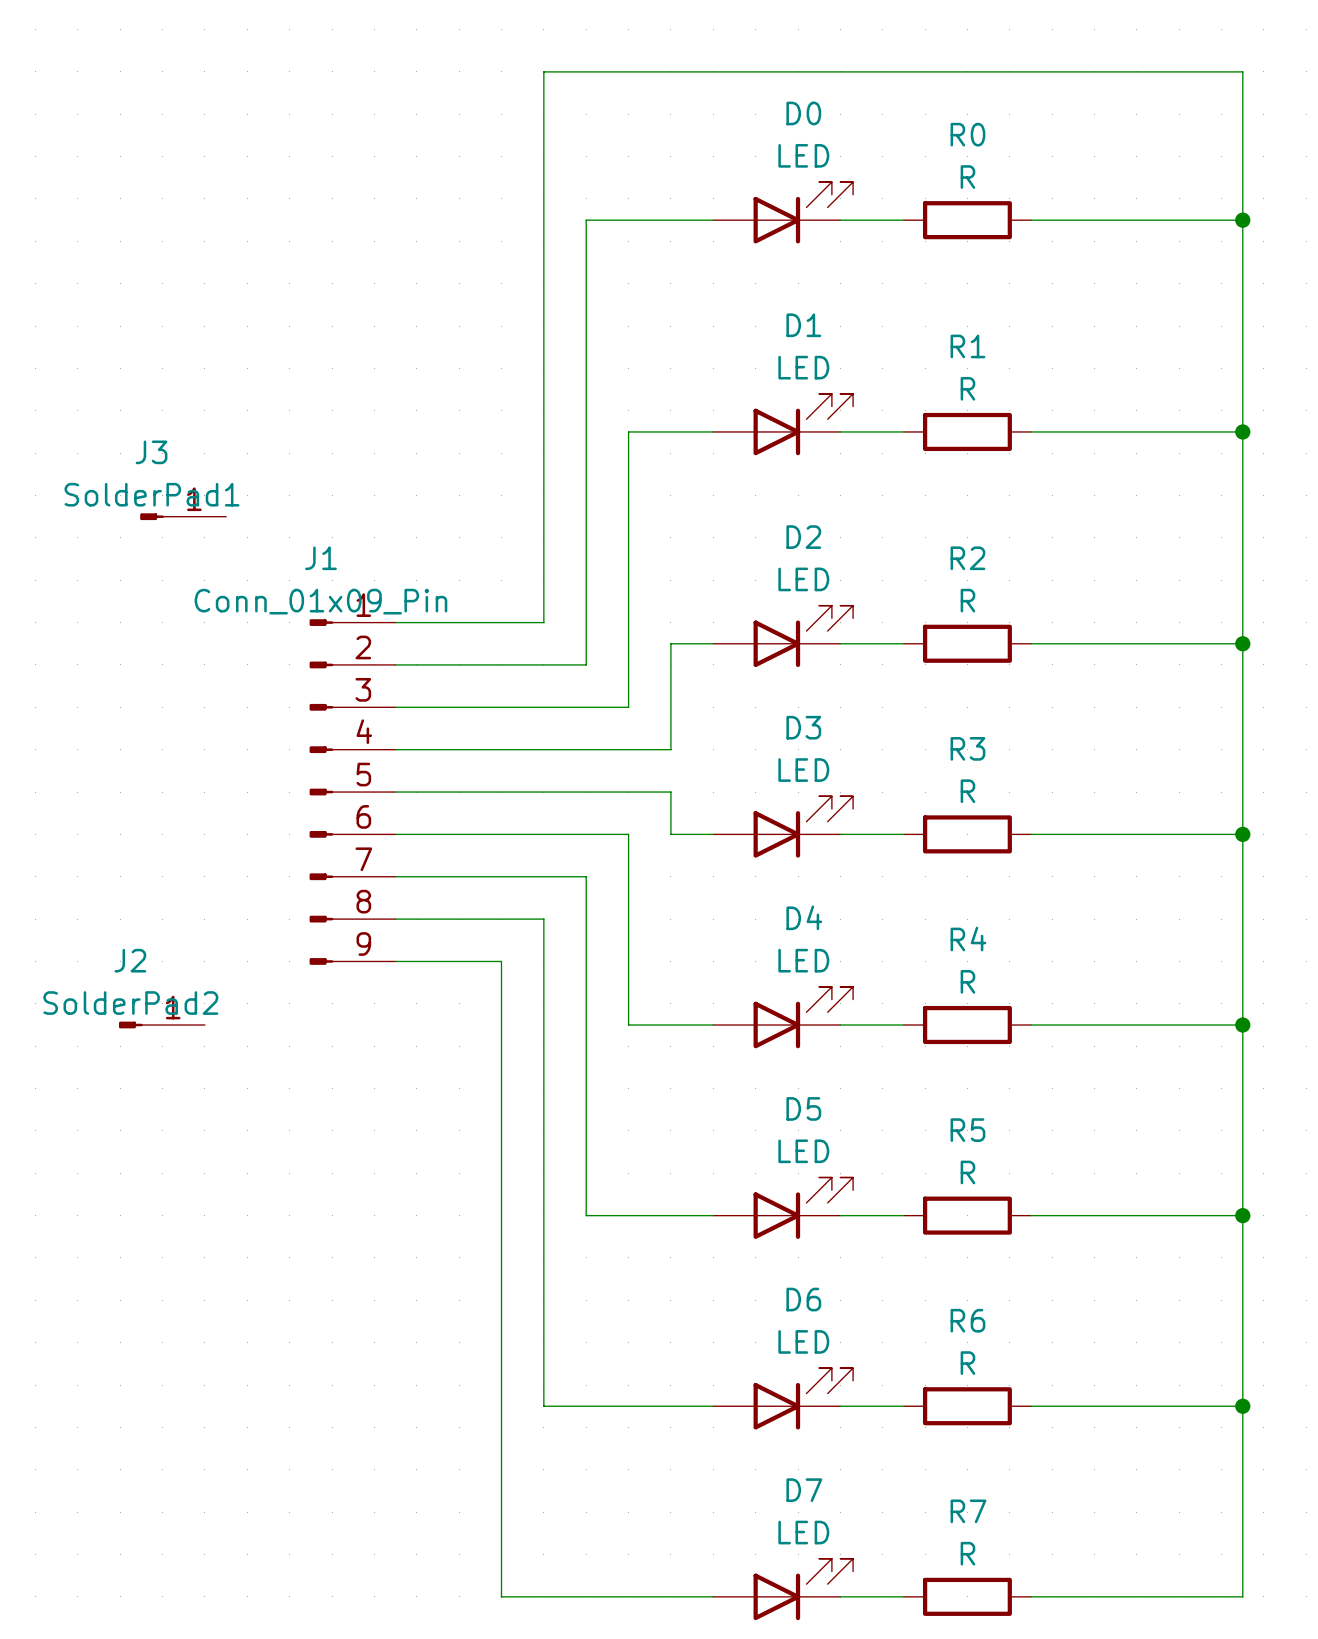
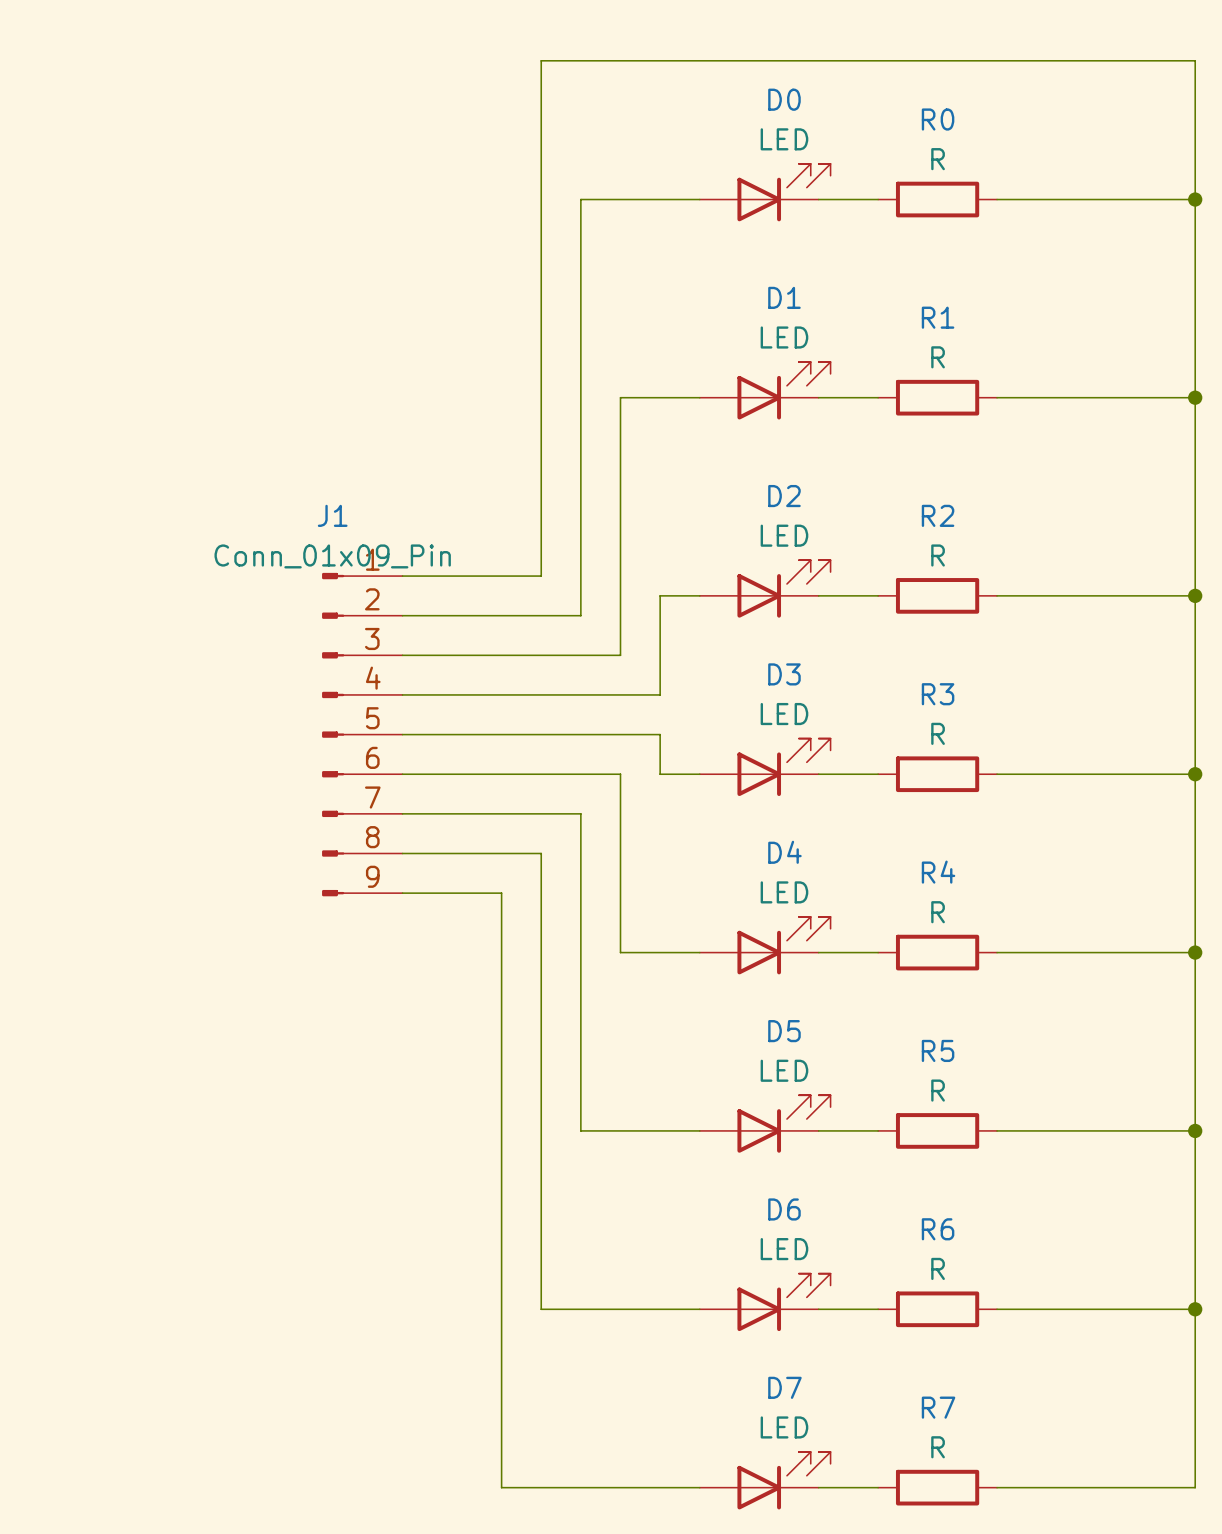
J3: SolderPad1 (183, 516) -> none
J2: SolderPad2 (161, 1025) -> none

